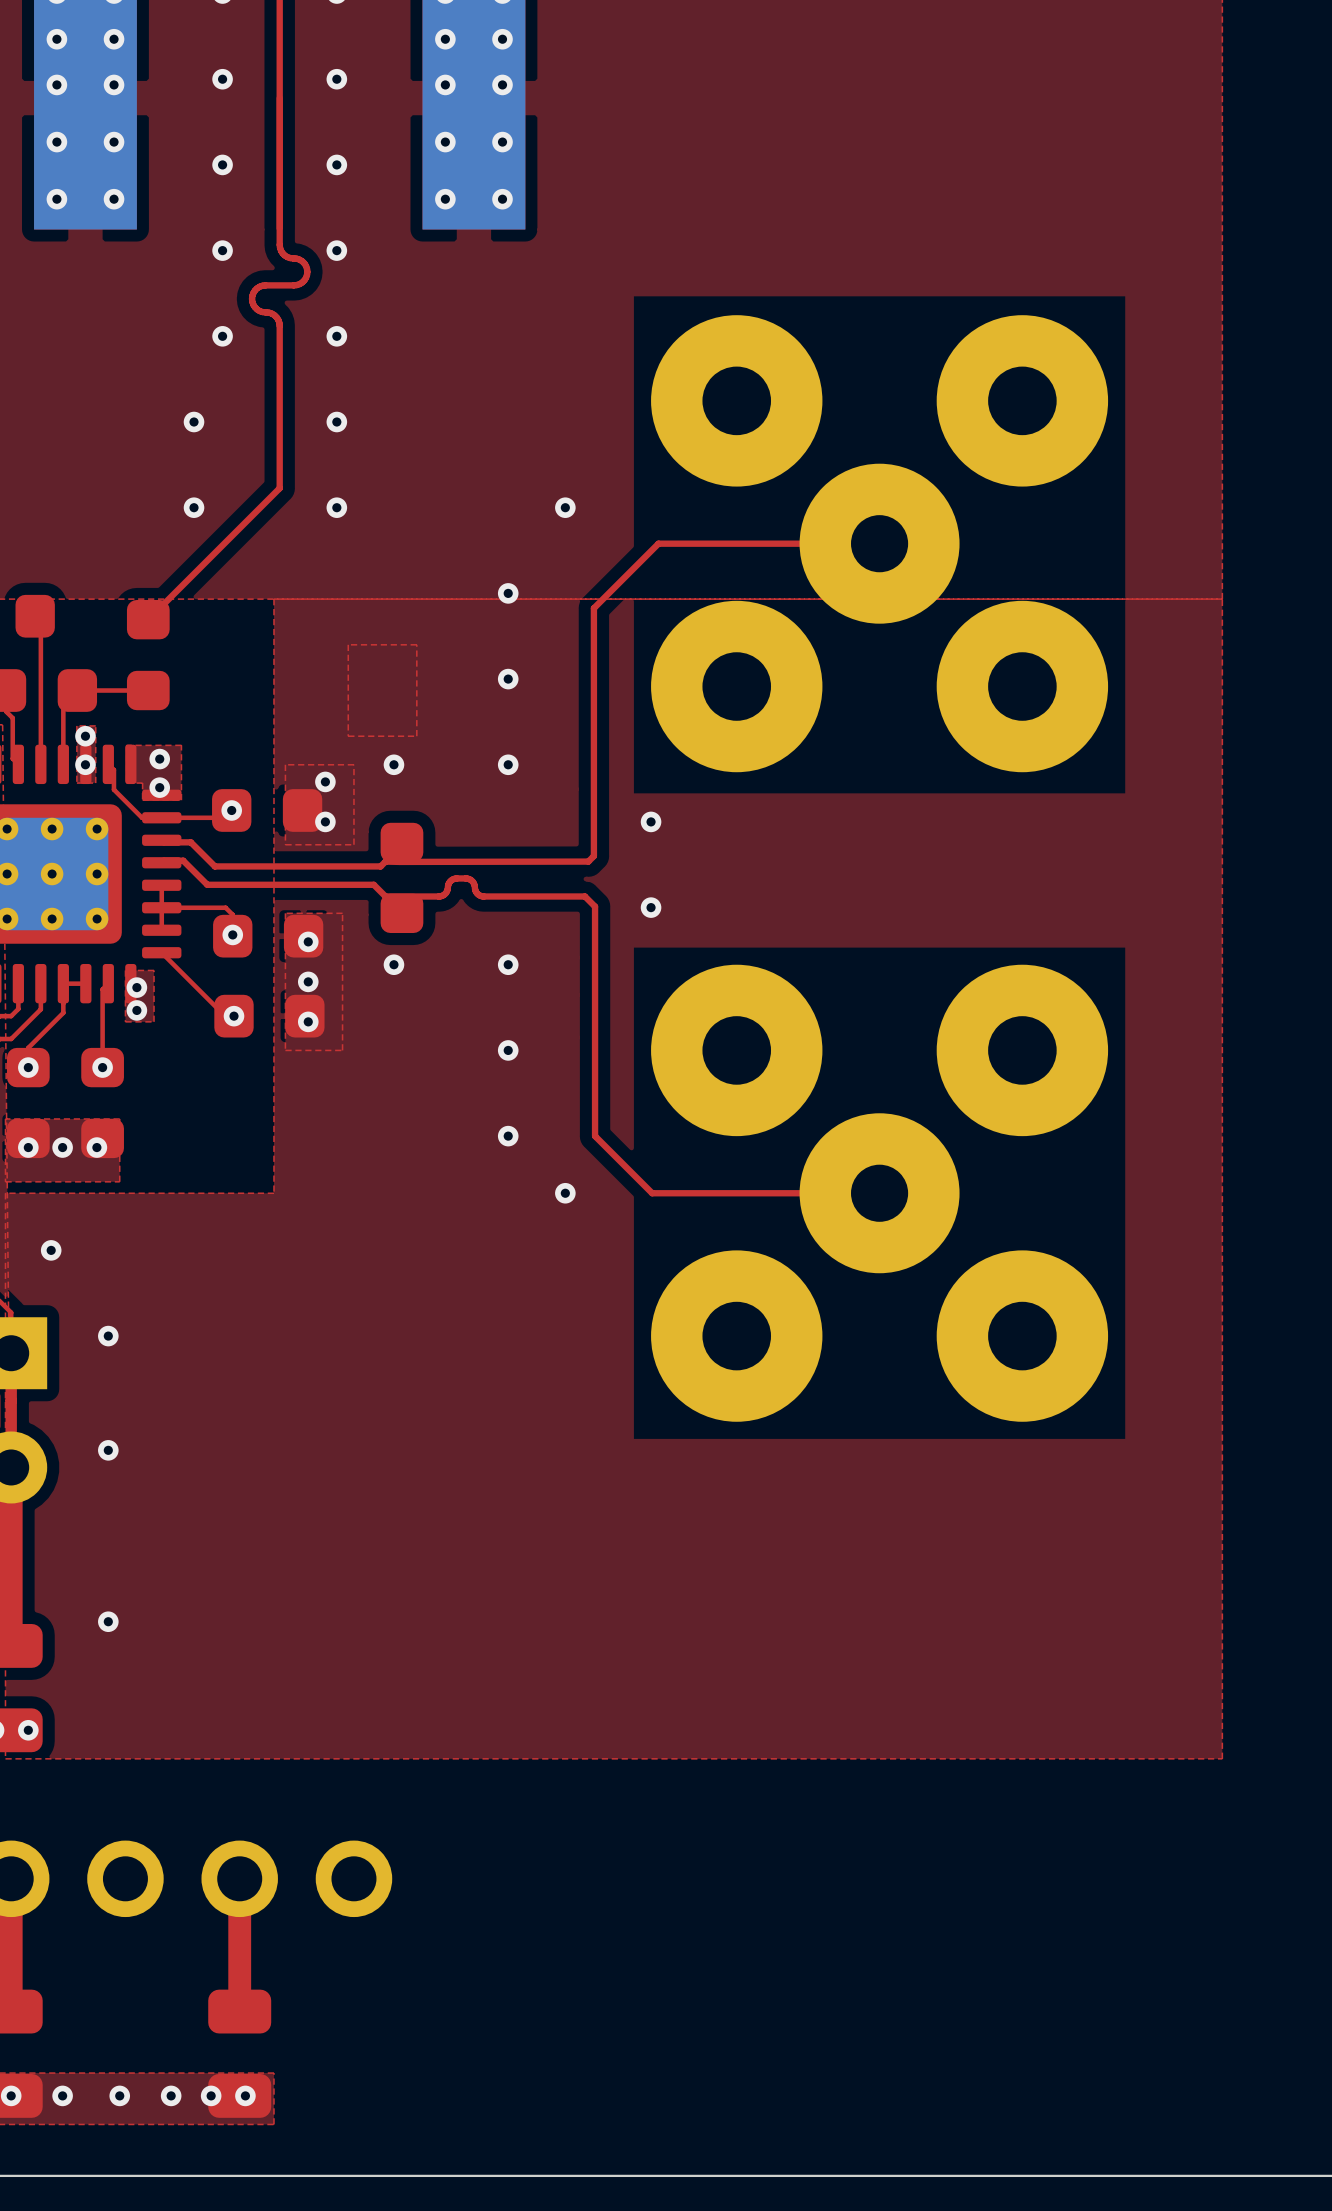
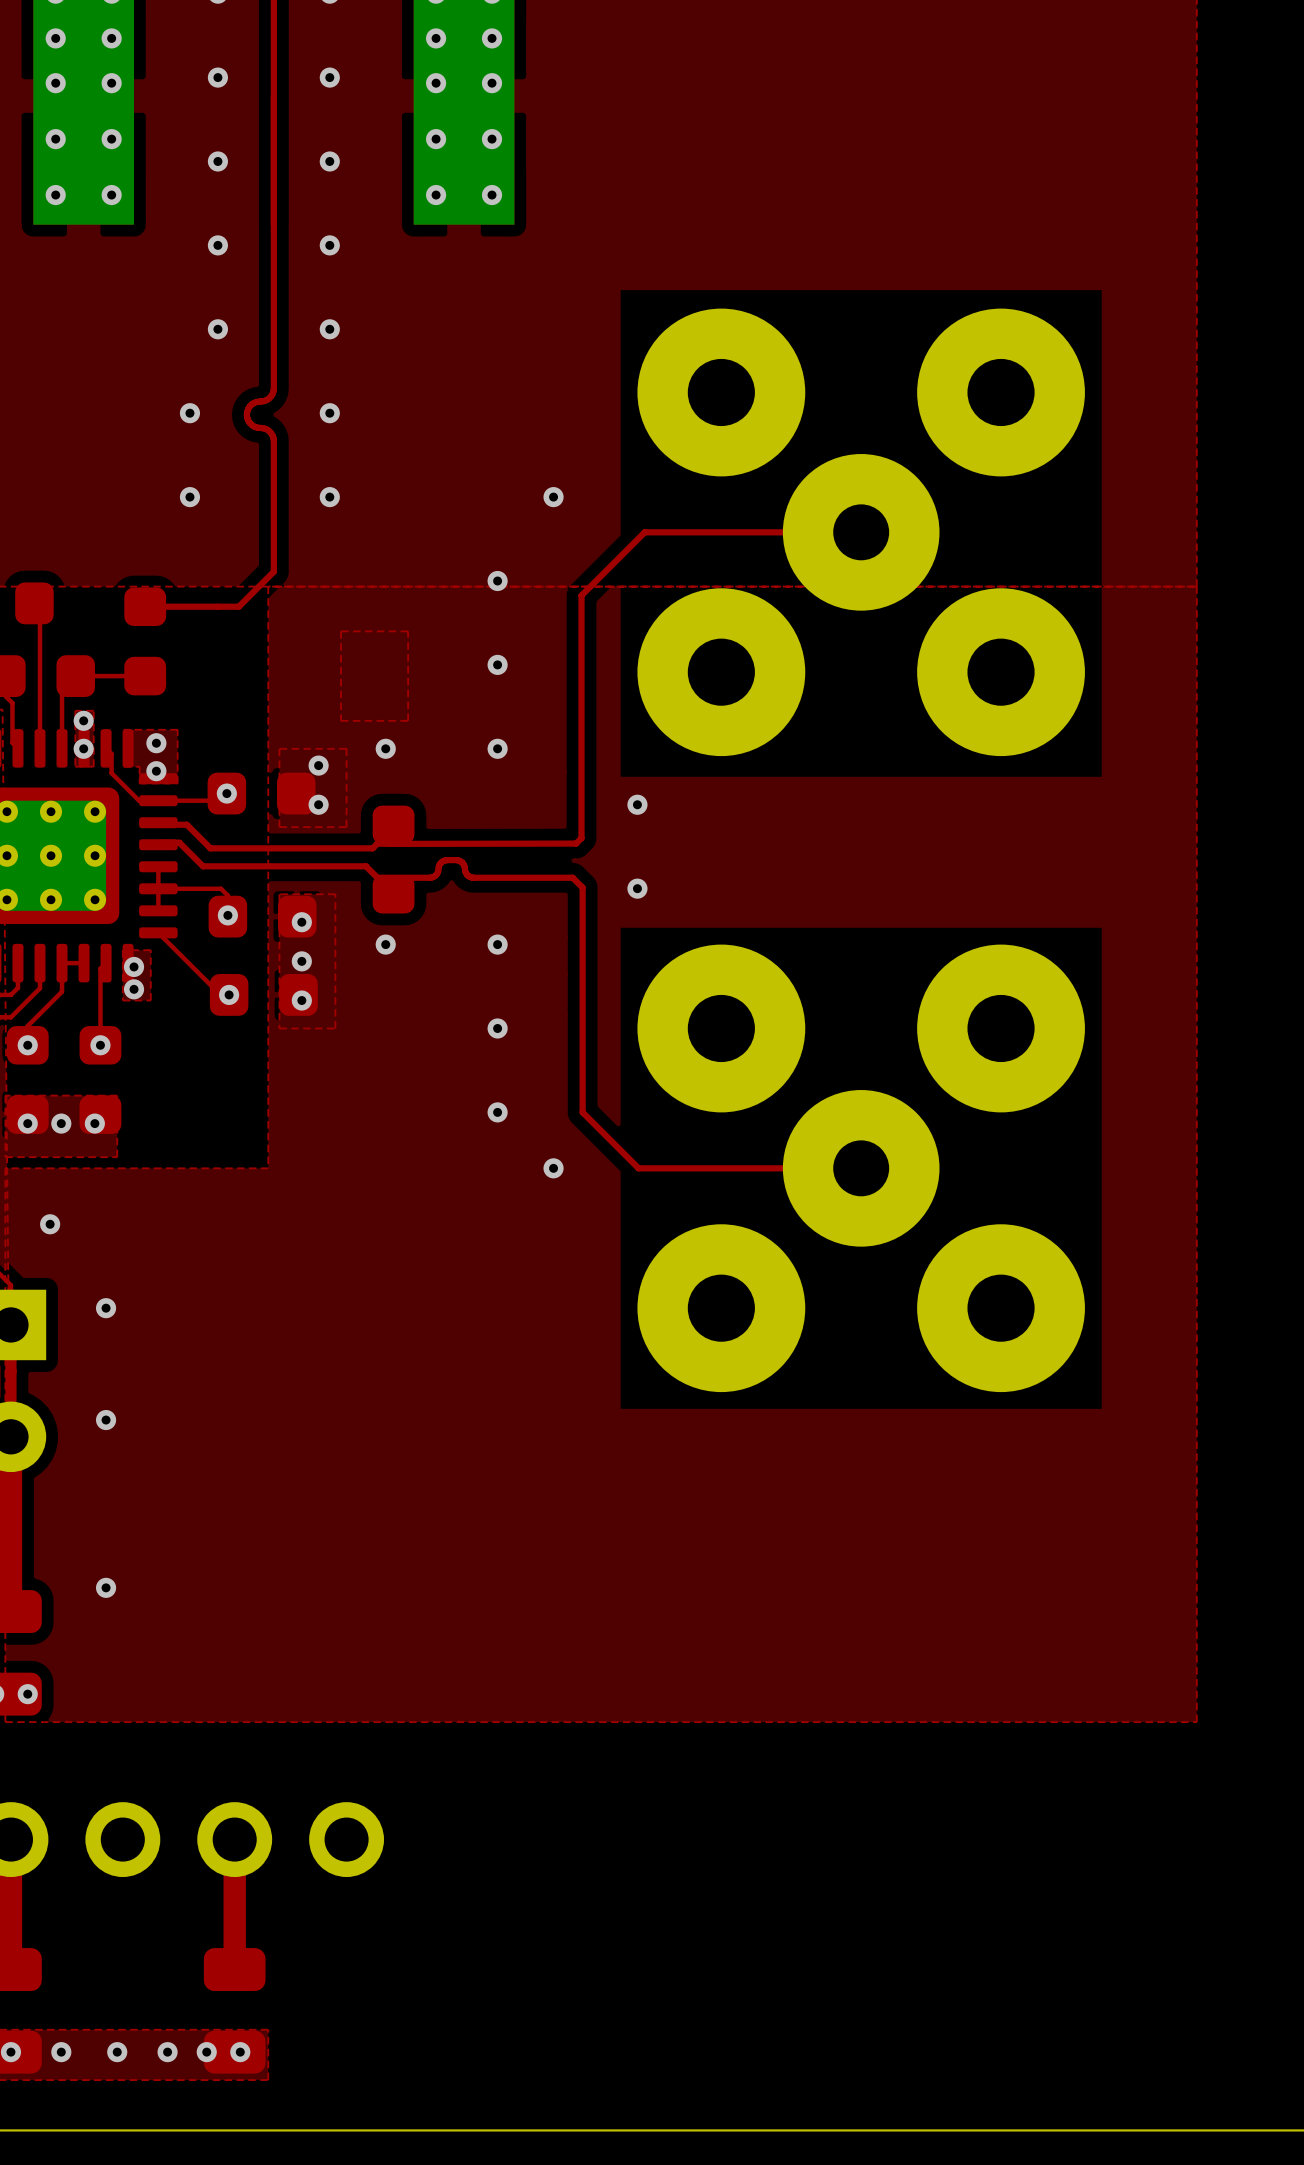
top track: (279, 244) (284, 255) (293, 258) -> none
top track: (293, 258) (302, 261) (307, 268) (307, 274) (302, 282) (293, 285) (262, 285) (253, 293) (253, 304) (259, 311) (265, 312) -> none
top track: (266, 312) (276, 317) (279, 325) -> (273, 239) (273, 319)
top track: (279, 396) (279, 450) -> (273, 388) (268, 398) (260, 401)
top track: none -> (260, 401) (251, 404) (246, 414) (251, 425) (260, 427)
top track: none -> (260, 427) (268, 430) (273, 441)
top track: (279, 488) (148, 619) -> (273, 478) (273, 571) (238, 606) (145, 606)

